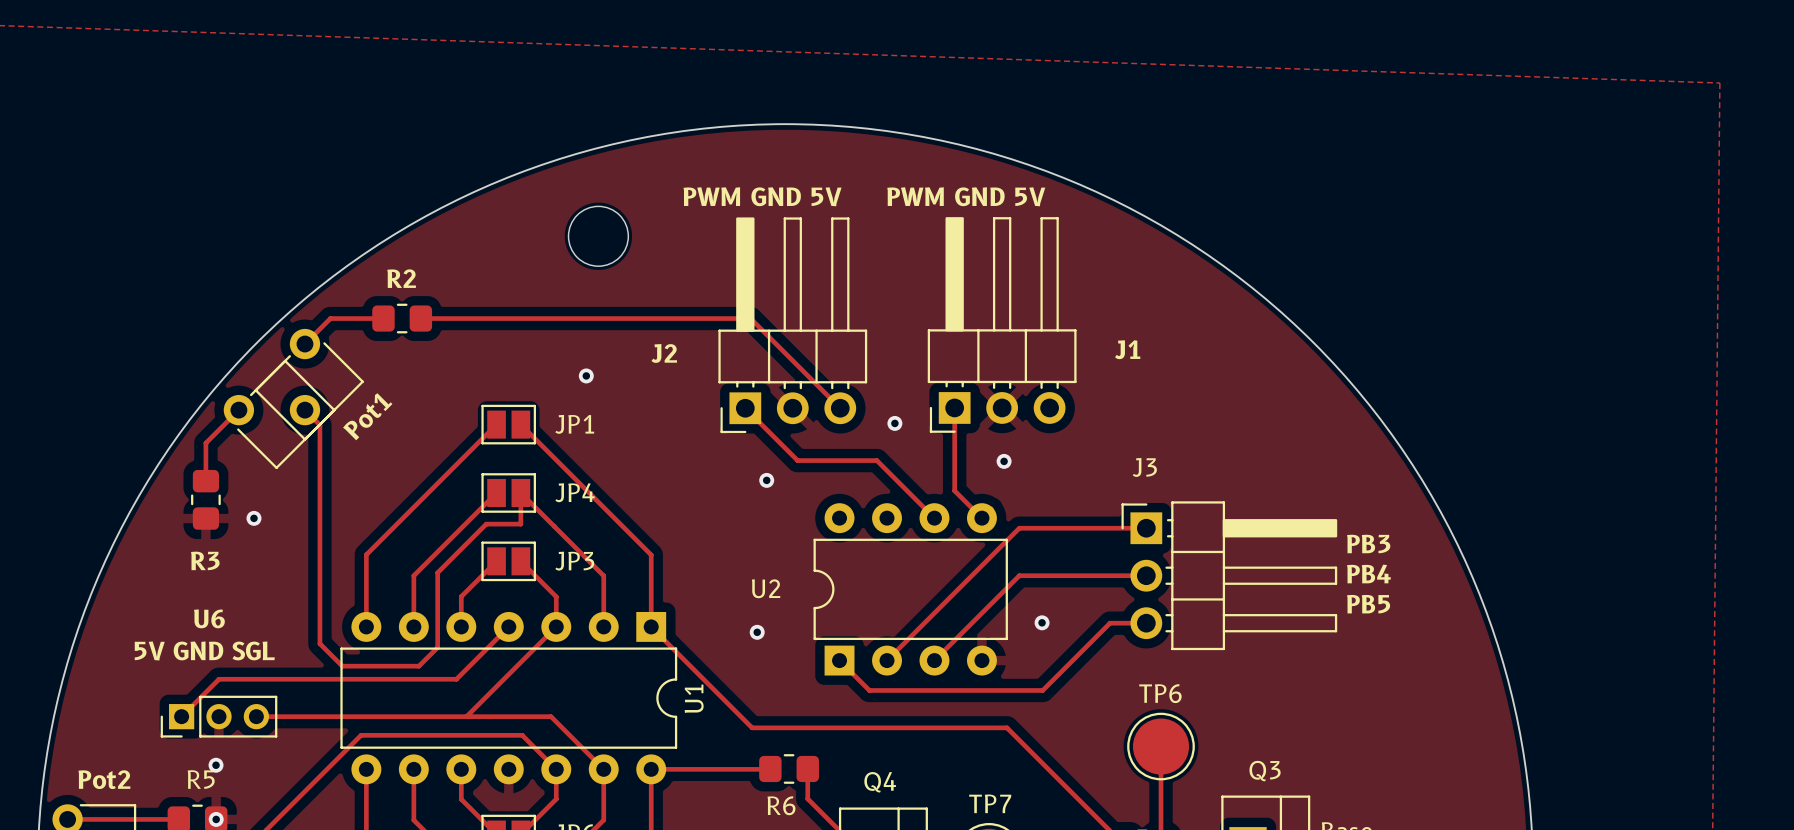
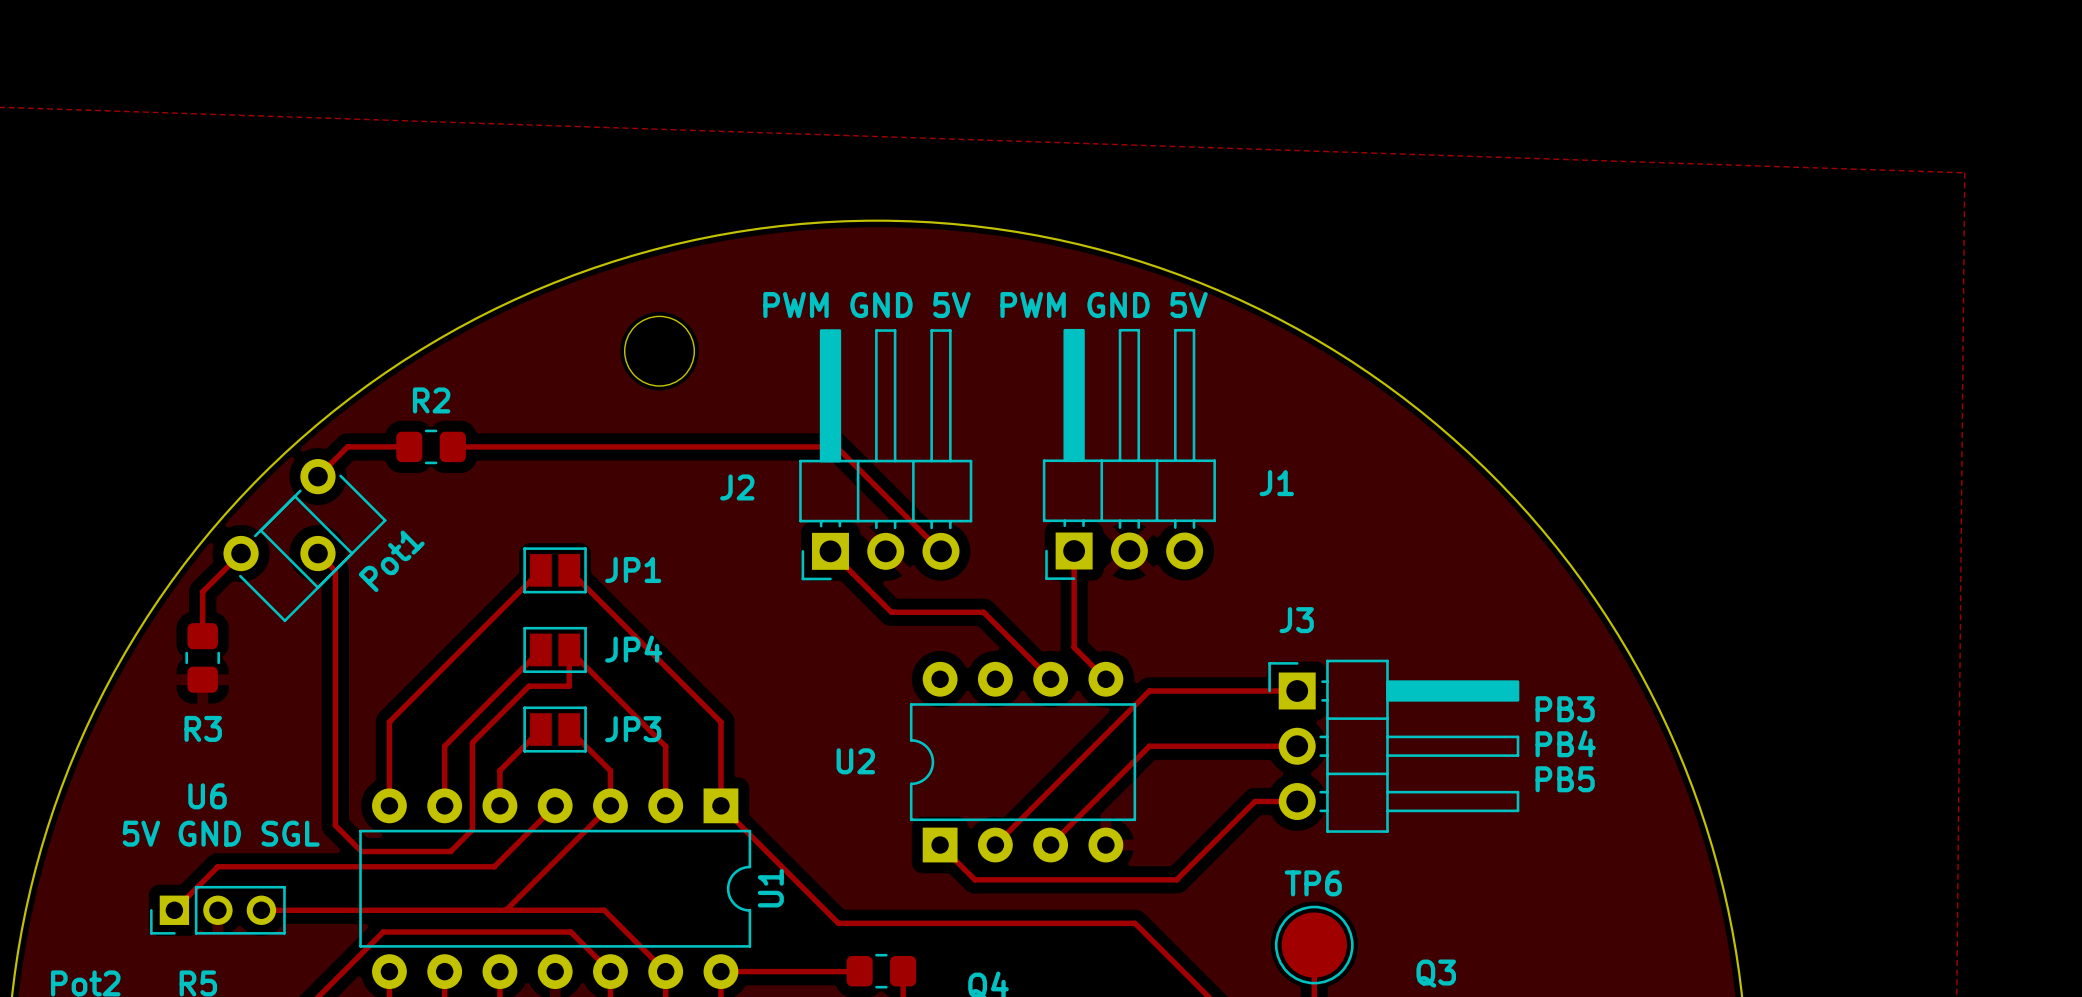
via: (586, 375) -> none
via: (894, 423) -> none
via: (1004, 461) -> none
via: (766, 480) -> none
via: (253, 518) -> none
via: (1042, 622) -> none
via: (757, 632) -> none
via: (216, 765) -> none

